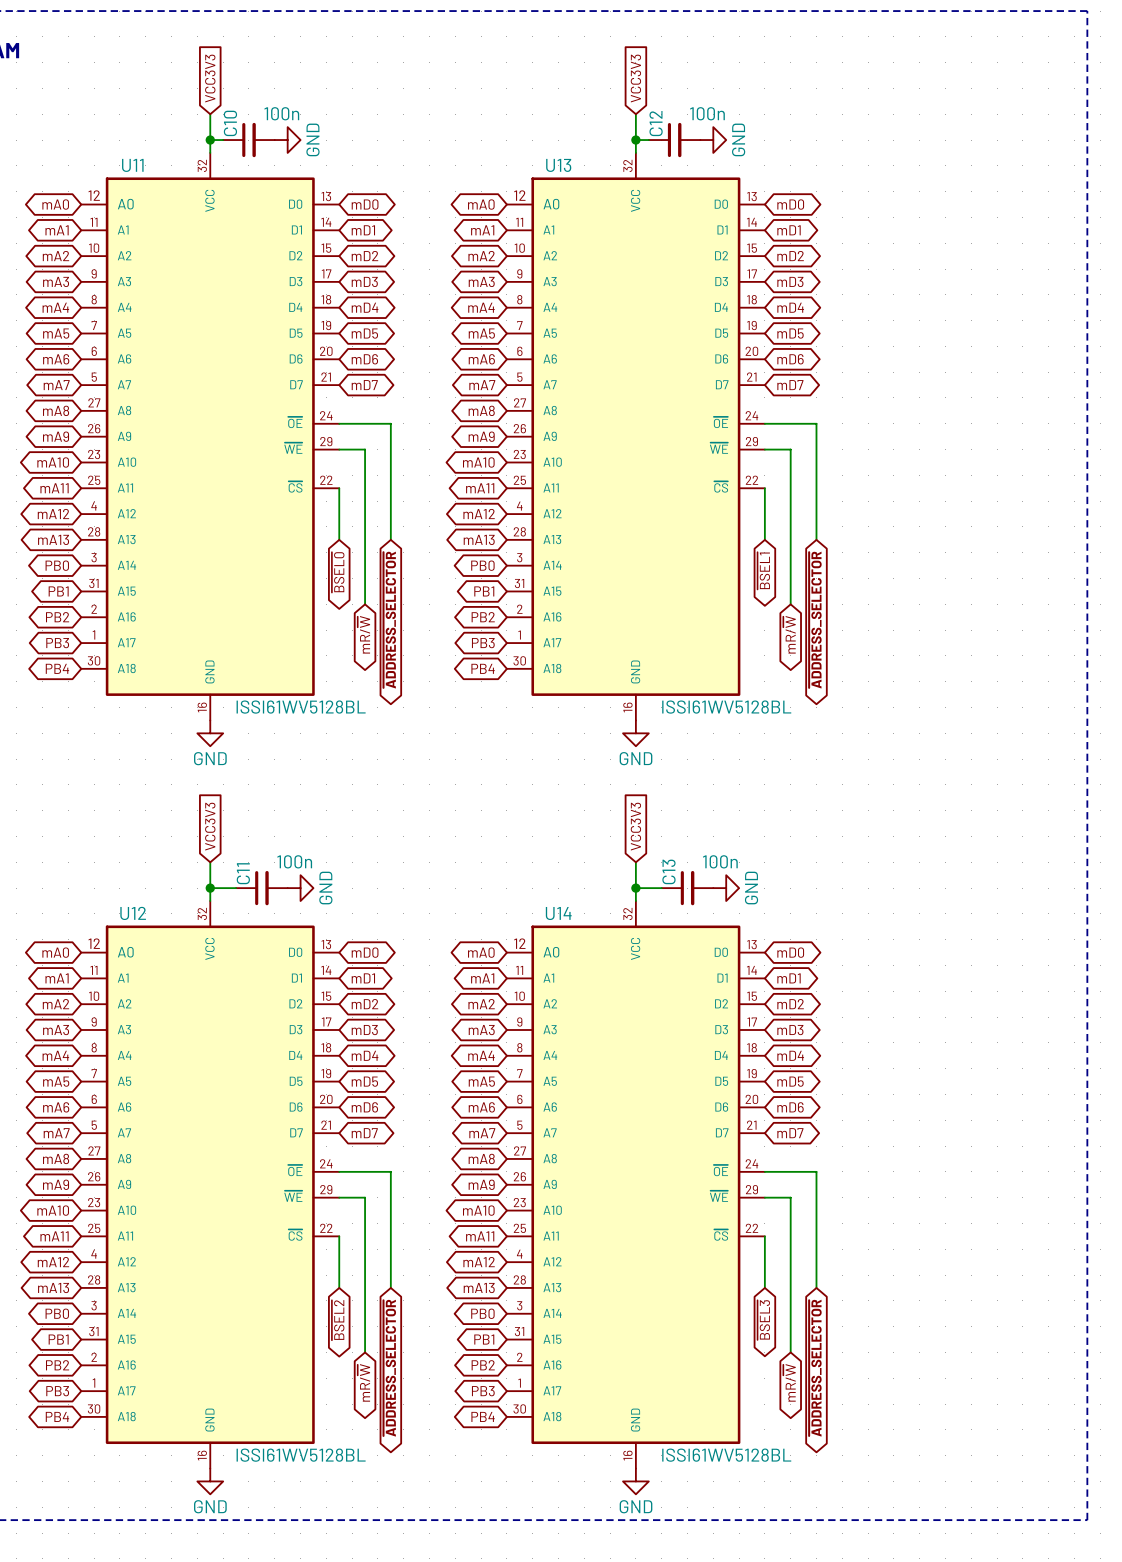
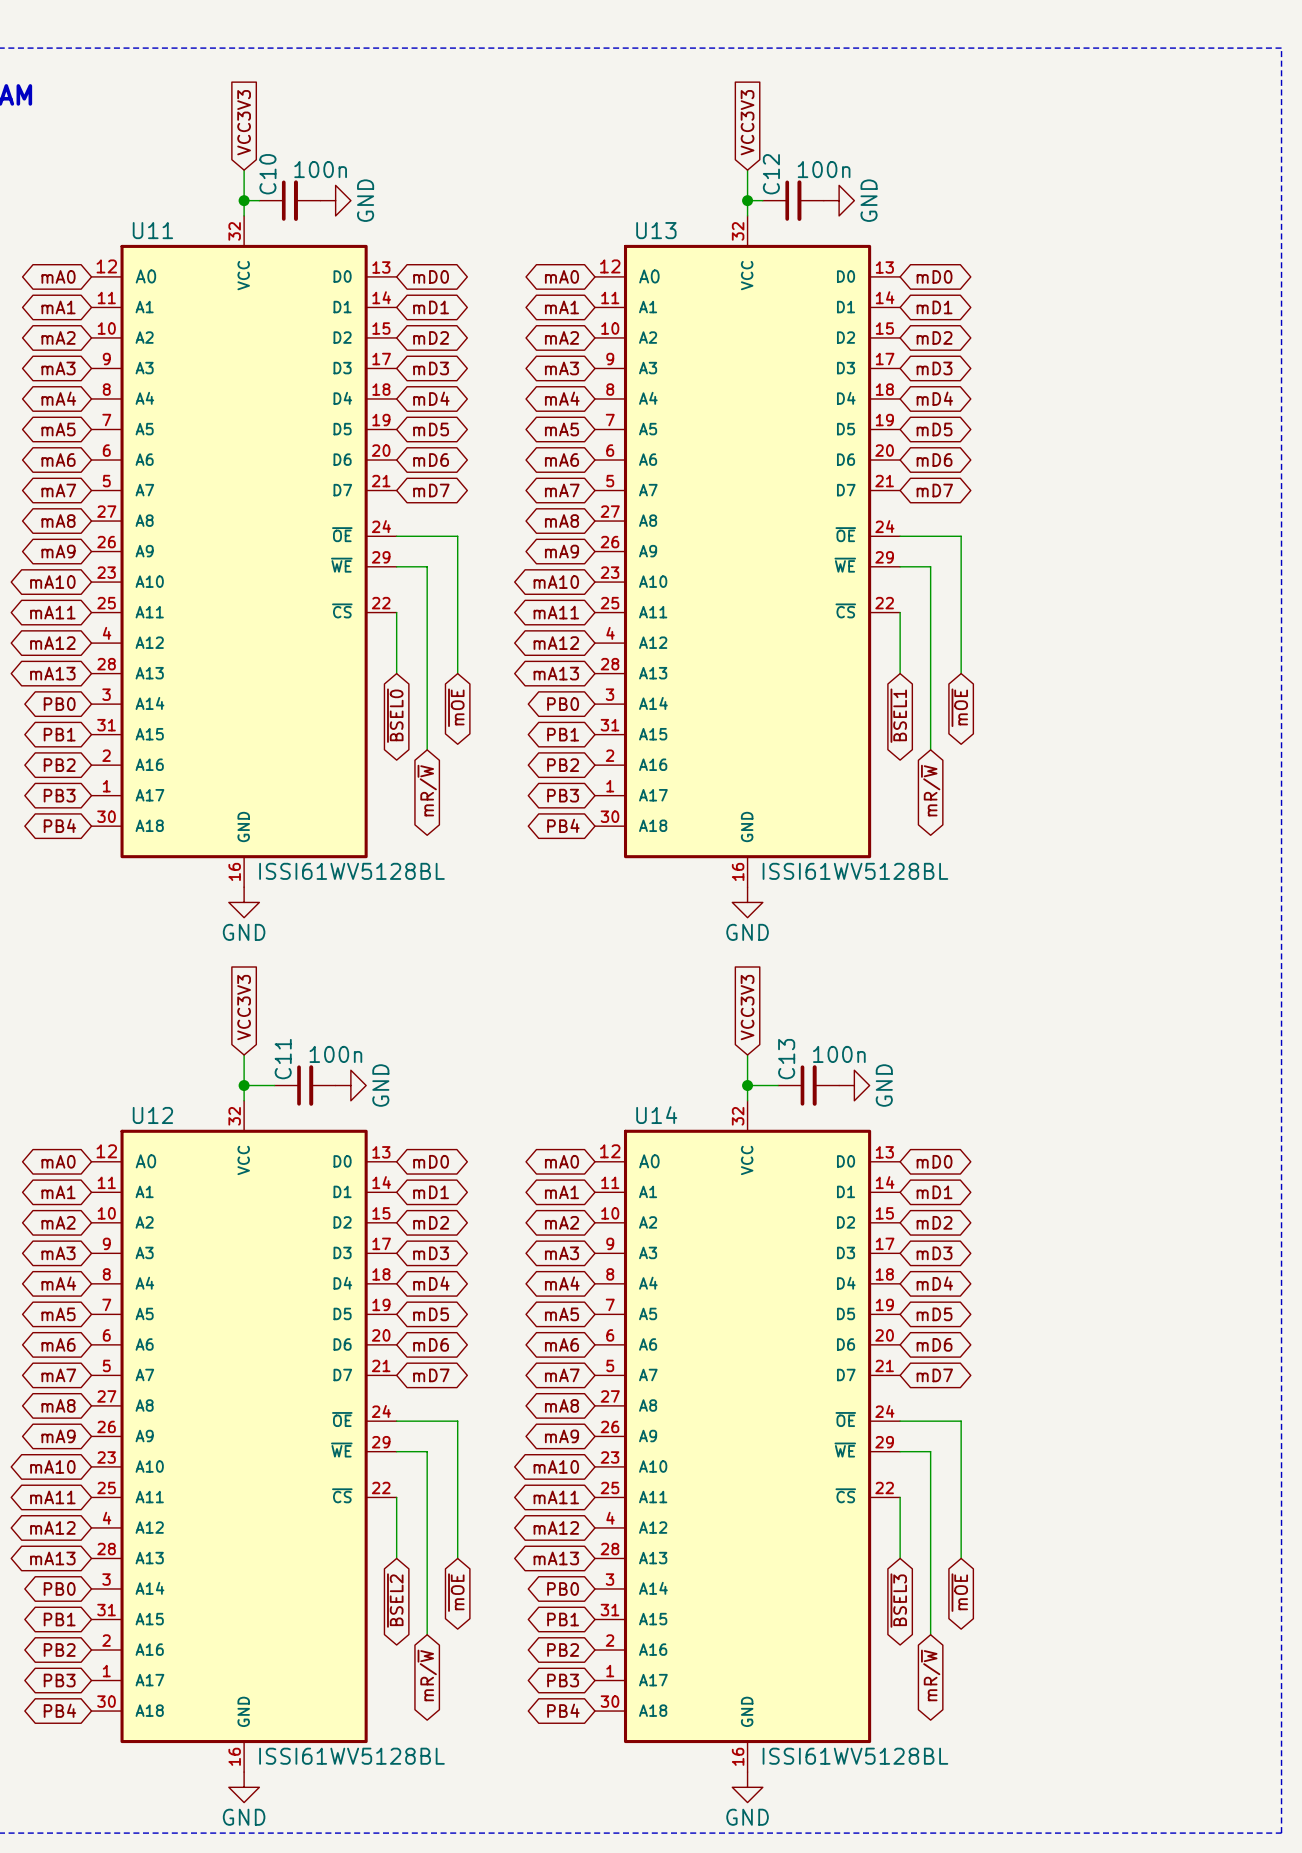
global label: ~{ADDRESS_SELECTOR} (389, 620) -> ~{mOE} (456, 707)
global label: ~{ADDRESS_SELECTOR} (815, 620) -> ~{mOE} (959, 707)
global label: ~{ADDRESS_SELECTOR} (389, 1368) -> ~{mOE} (456, 1592)
global label: ~{ADDRESS_SELECTOR} (815, 1368) -> ~{mOE} (959, 1592)

